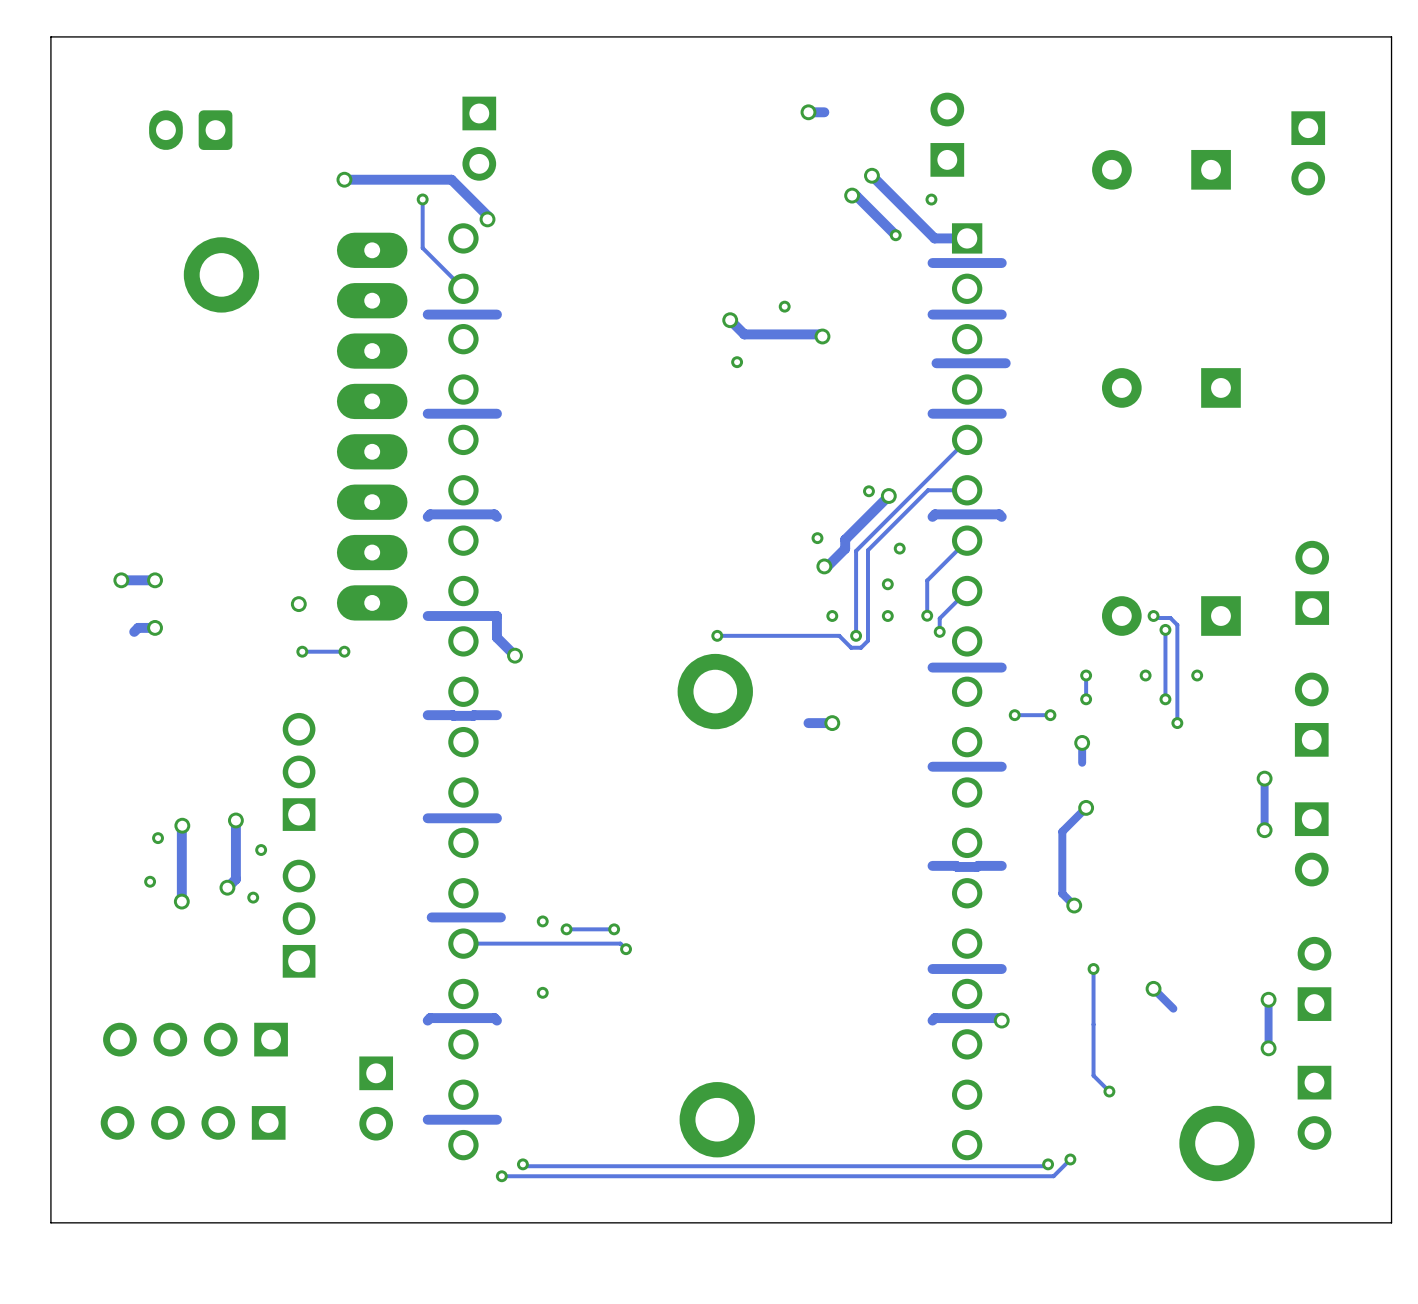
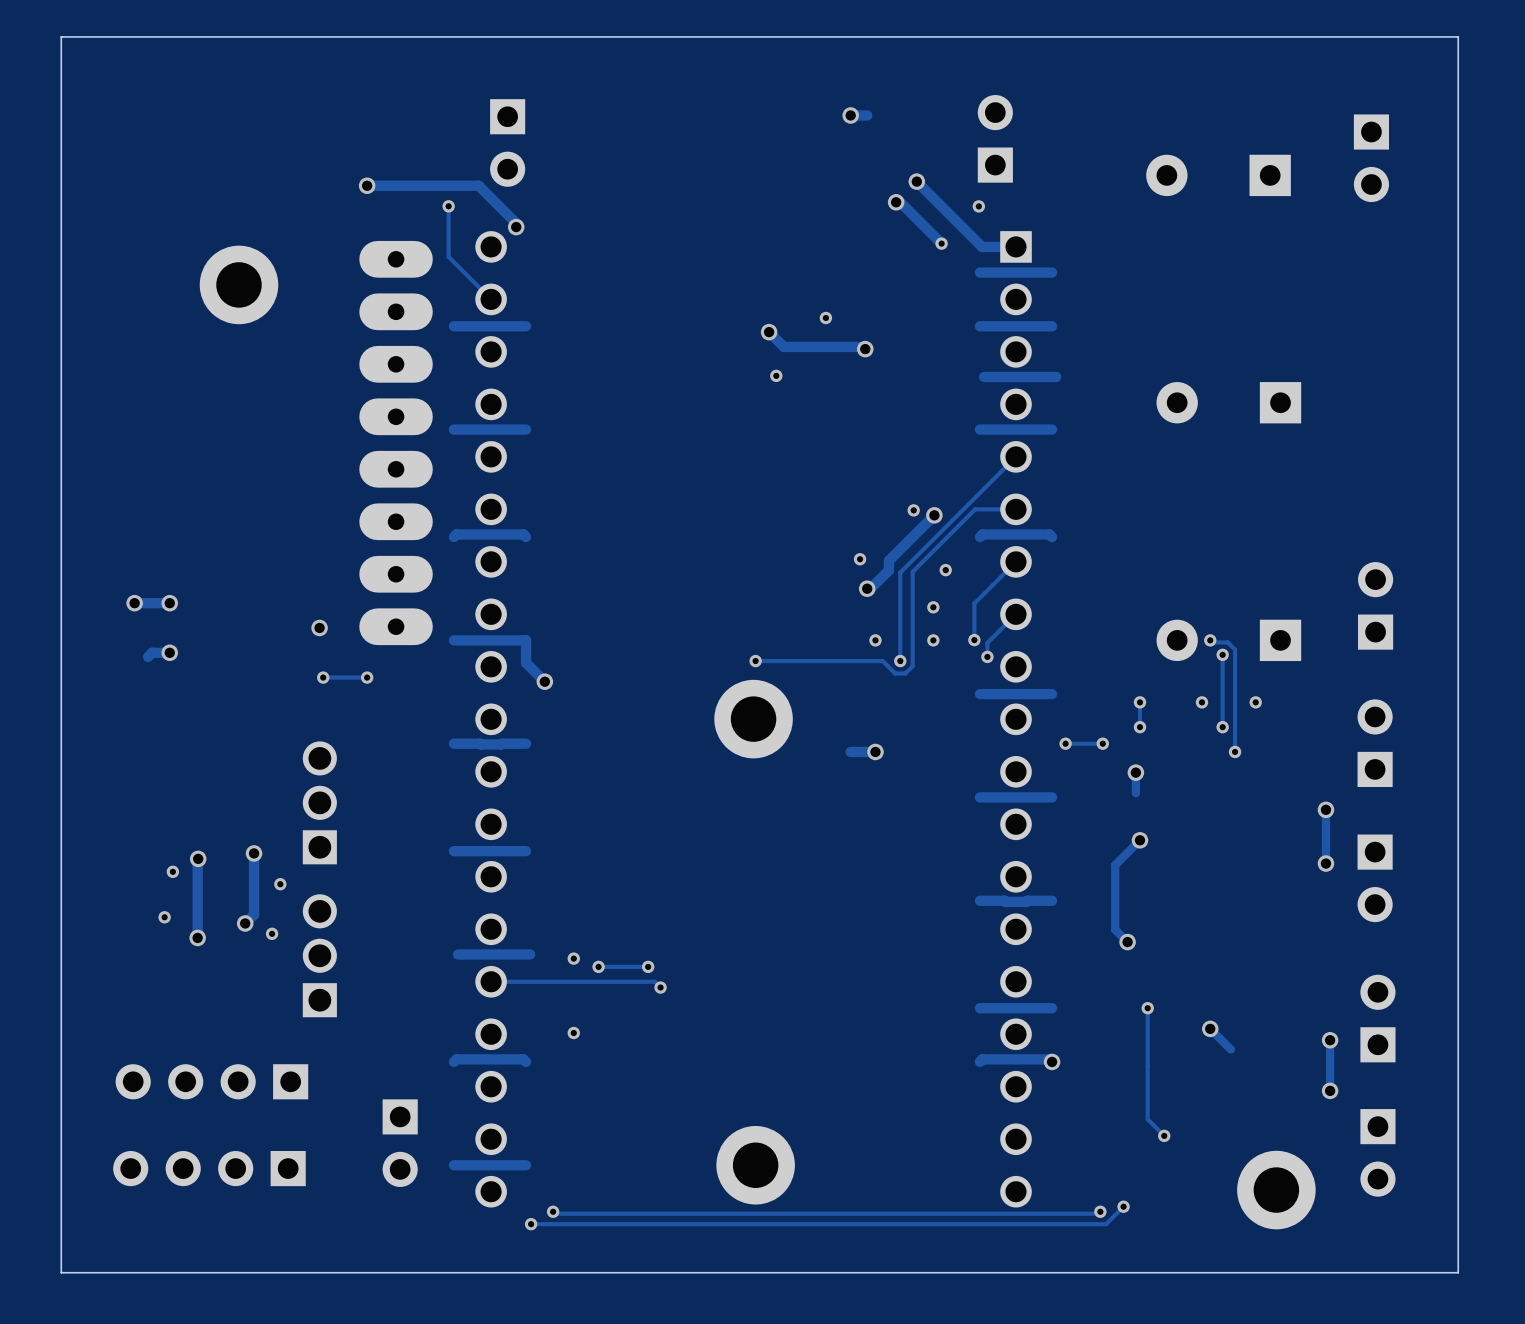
part: (190, 130) -> none

